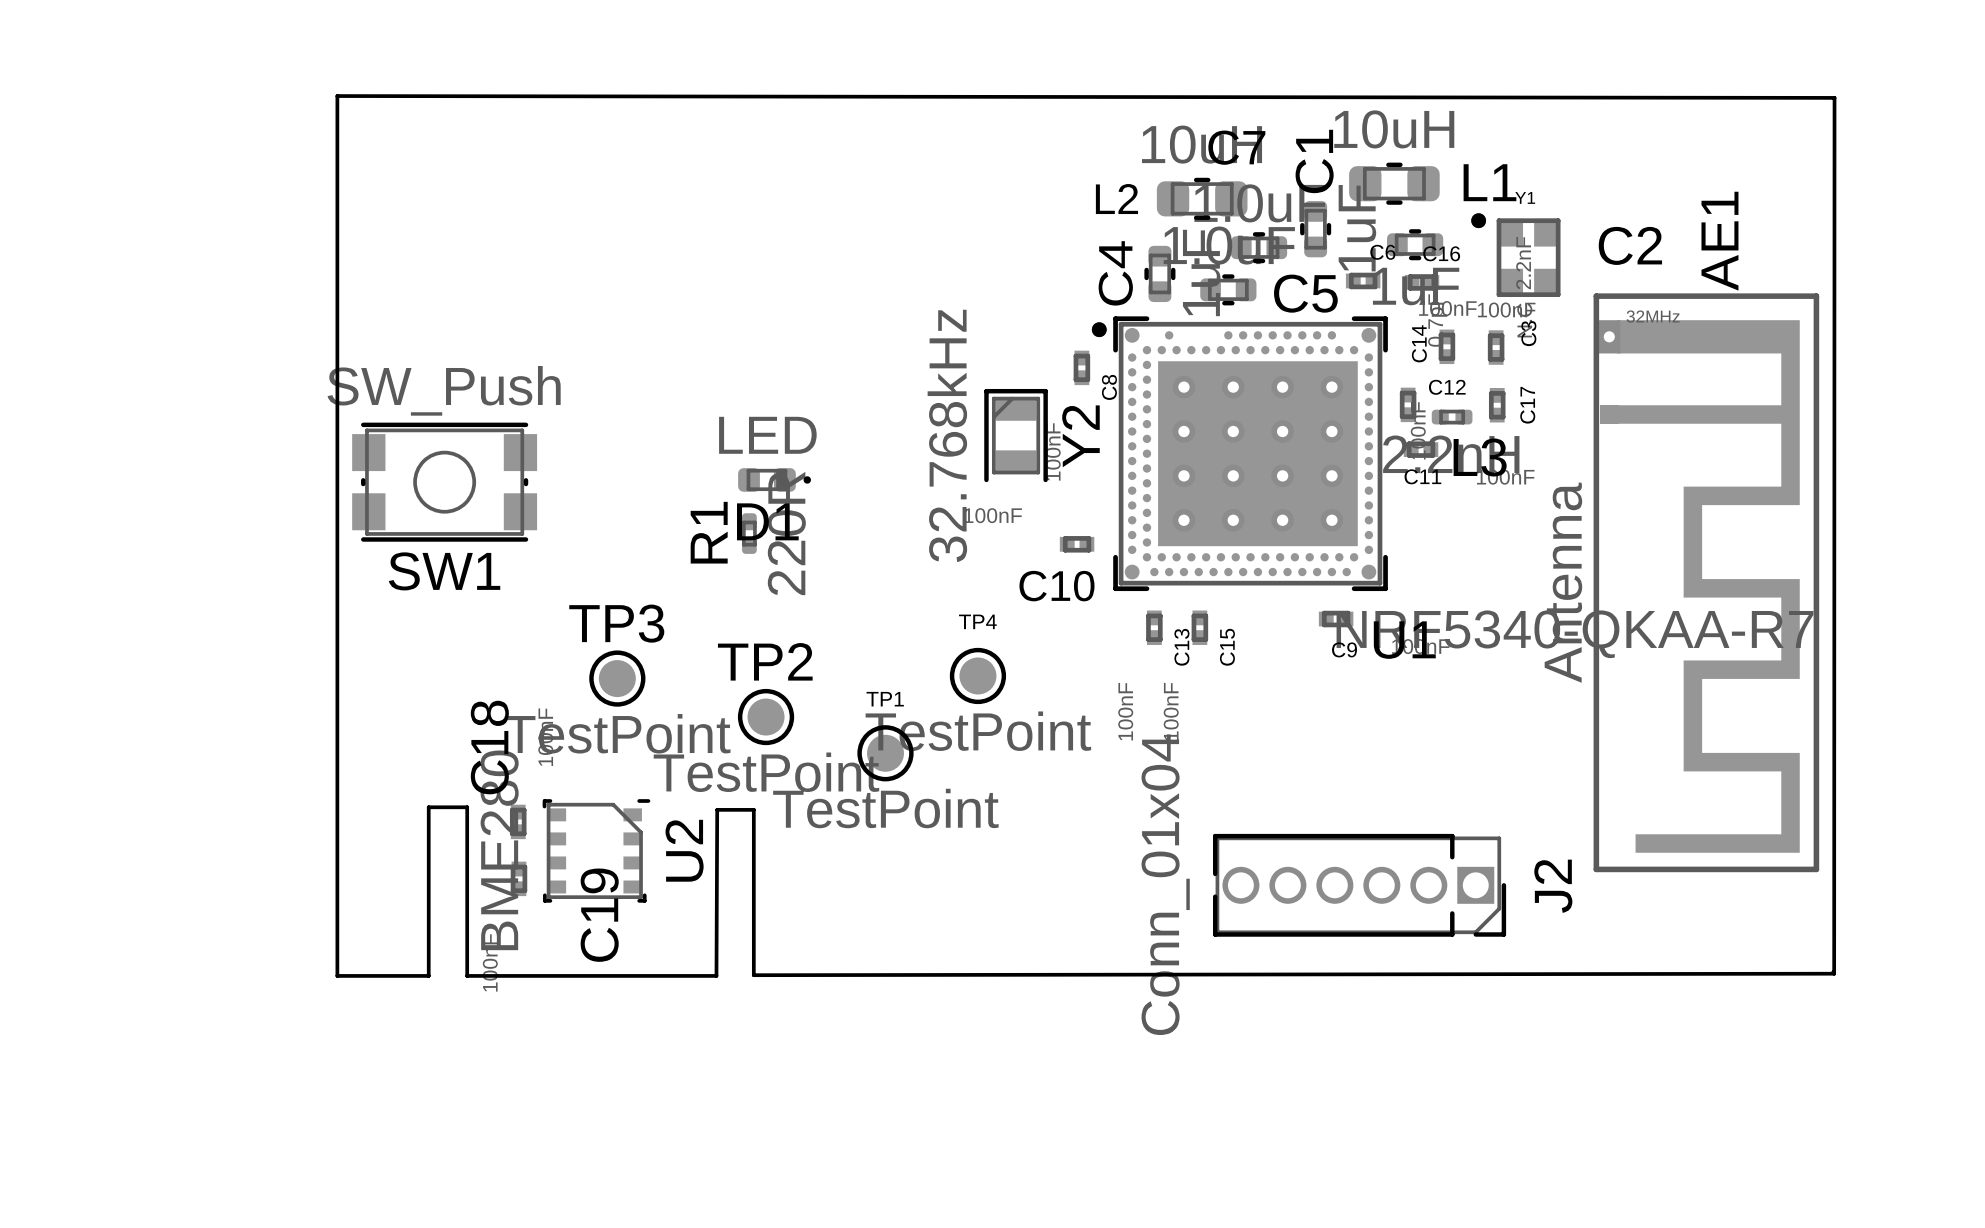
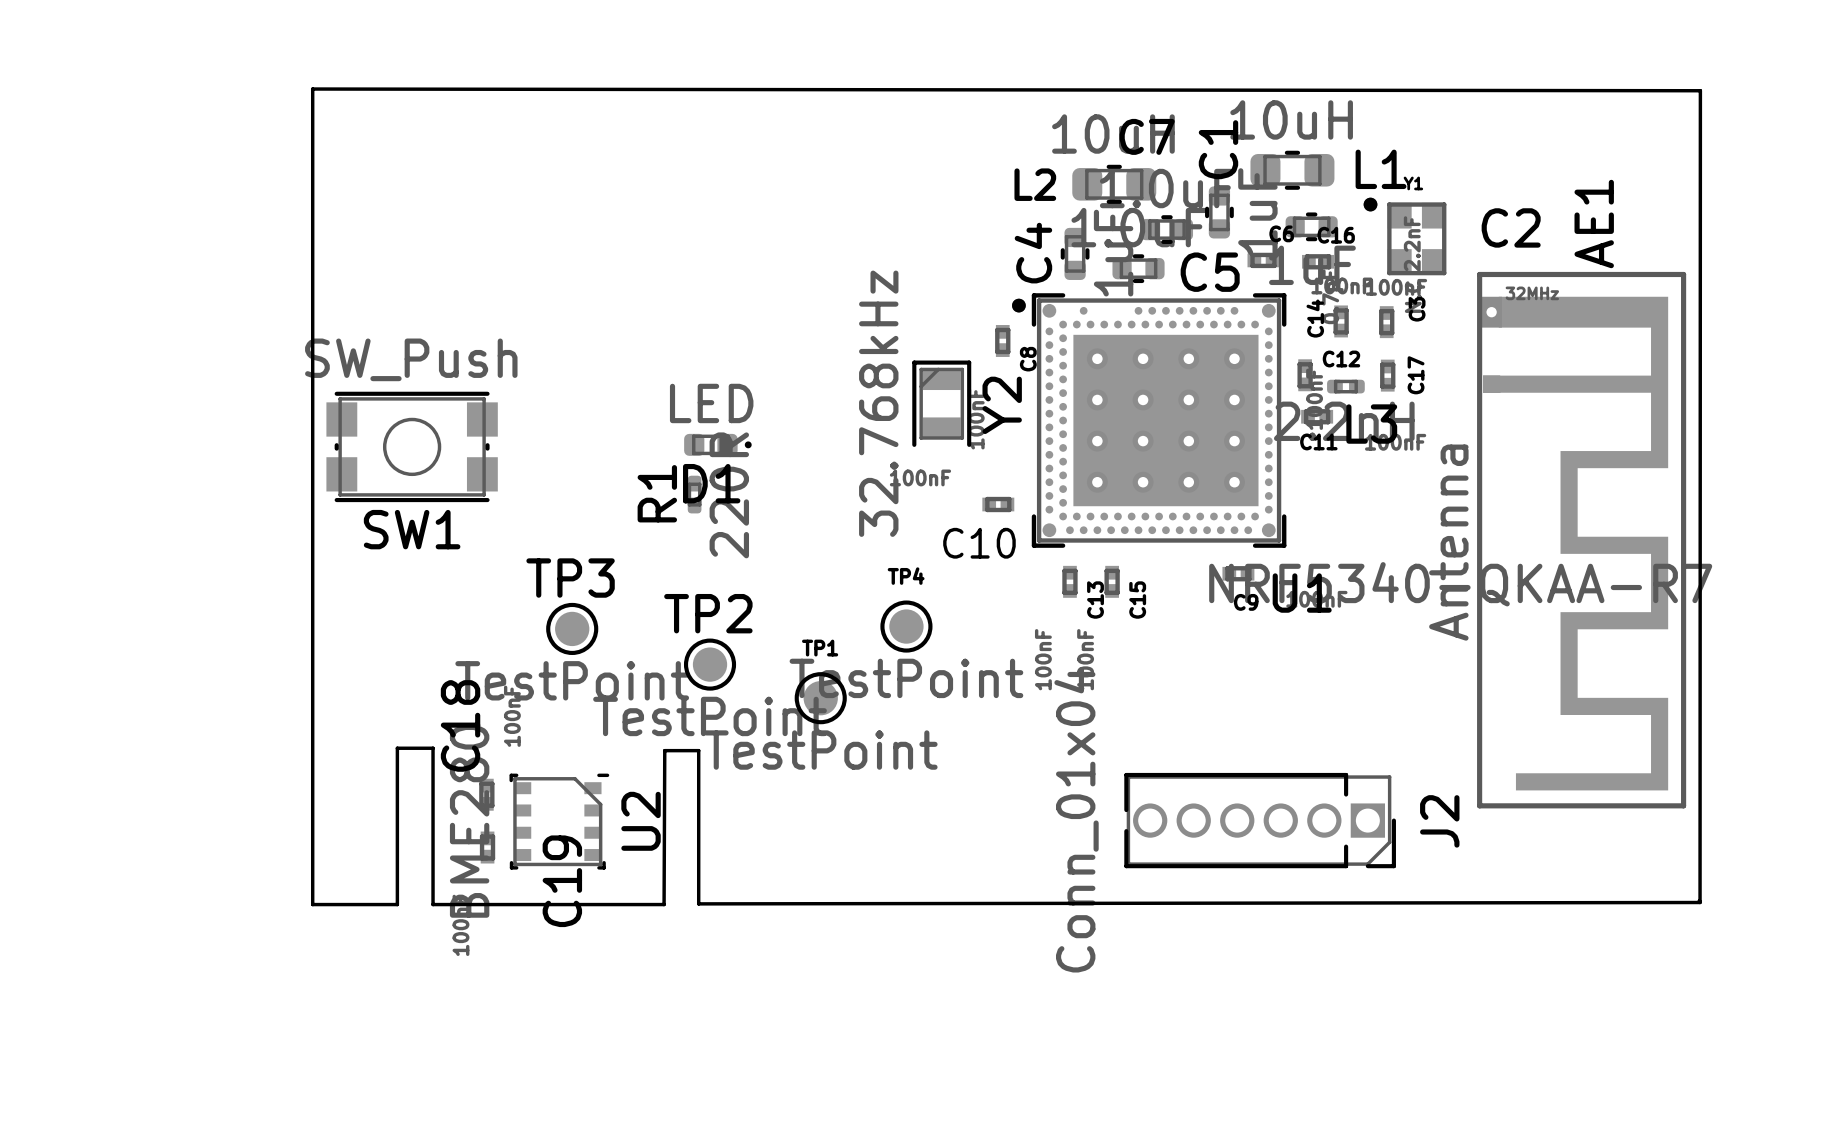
C18 position: (518, 821) -> (486, 794)
U2 position: (596, 850) -> (559, 821)
C19 position: (518, 878) -> (487, 847)

